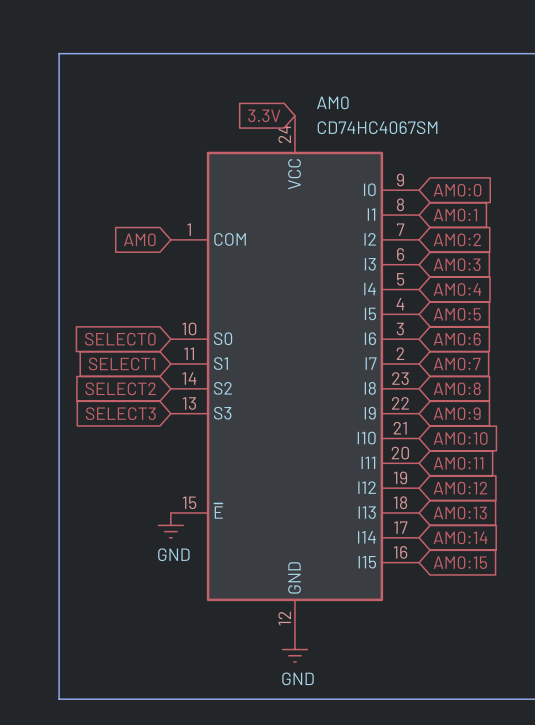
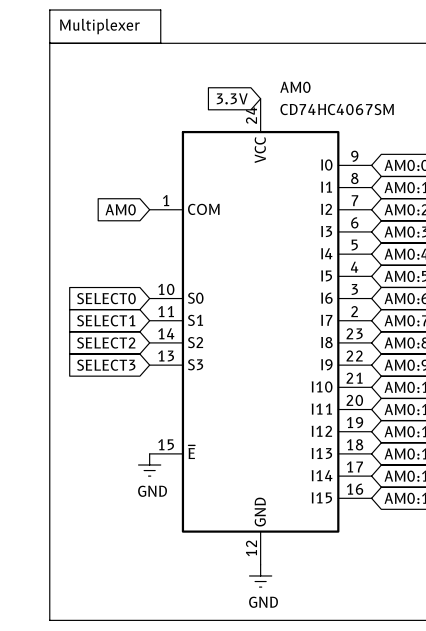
line: none -> (49, 10) (160, 10) (160, 43) (49, 43) (49, 10)
text: none -> Multiplexer (99, 26)

